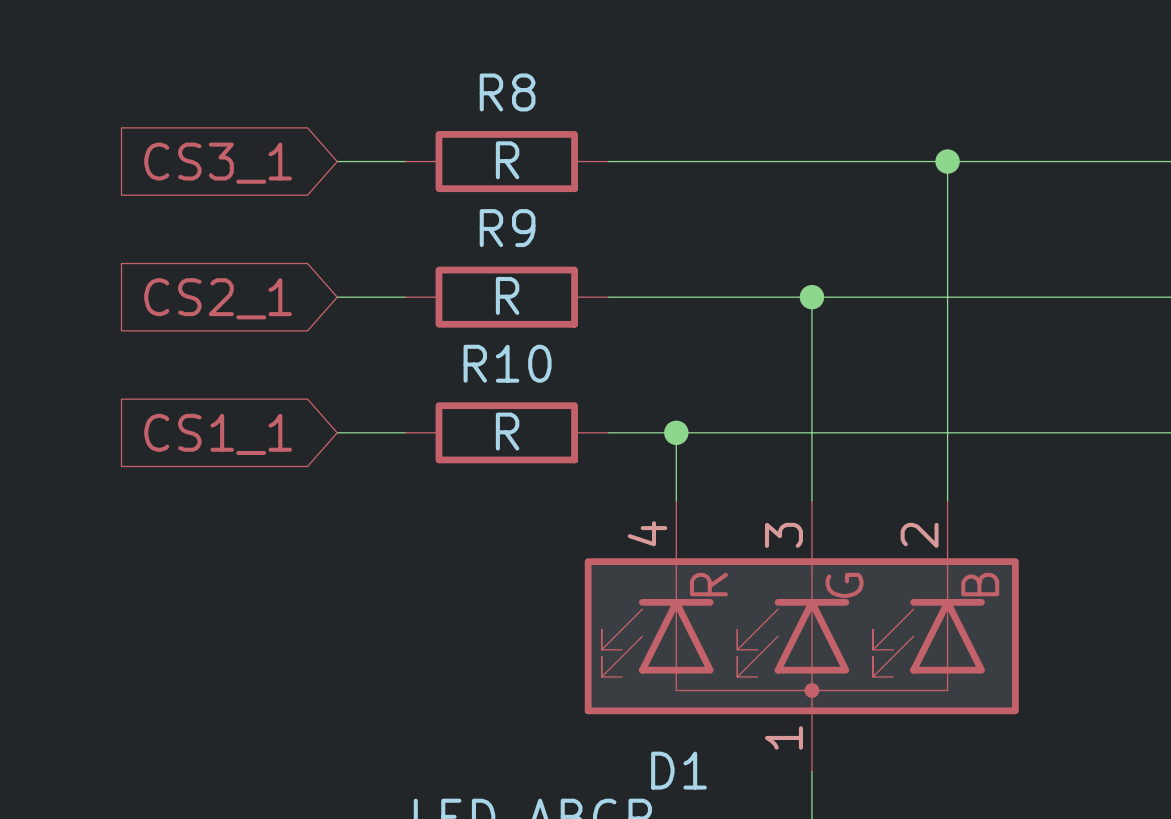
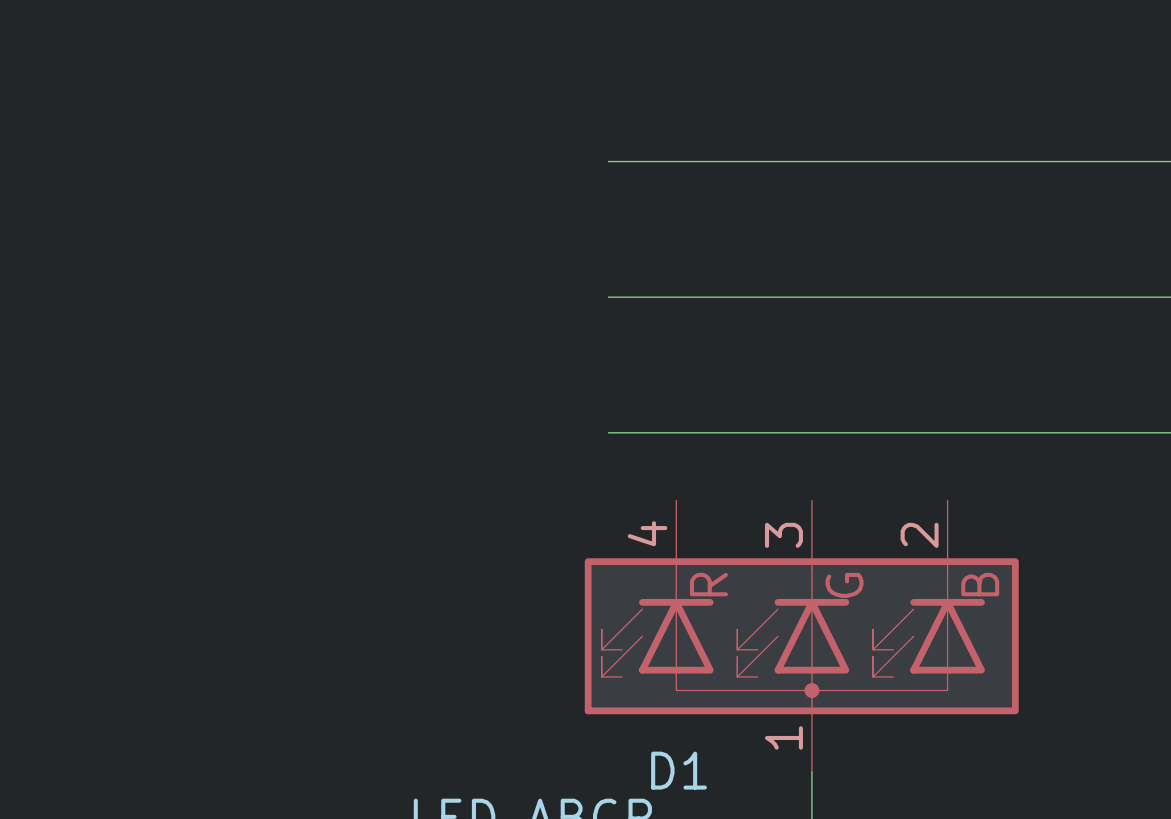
wire: (337, 161) (405, 161) -> none
R8: R (506, 161) -> none
wire: (947, 161) (947, 500) -> none
junction: (947, 161) -> none
global label: CS3_1 (218, 163) -> none
wire: (337, 297) (405, 297) -> none
R9: R (506, 297) -> none
wire: (811, 297) (811, 500) -> none
junction: (811, 297) -> none
global label: CS2_1 (218, 298) -> none
wire: (337, 432) (405, 432) -> none
R10: R (506, 432) -> none
wire: (676, 432) (676, 500) -> none
junction: (676, 432) -> none
global label: CS1_1 (218, 434) -> none

